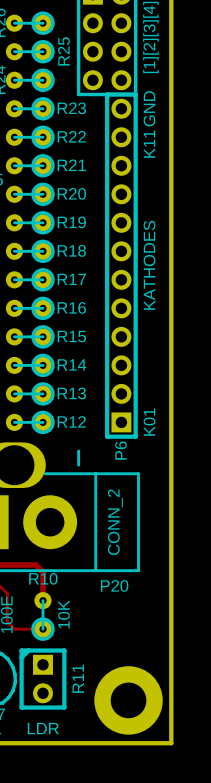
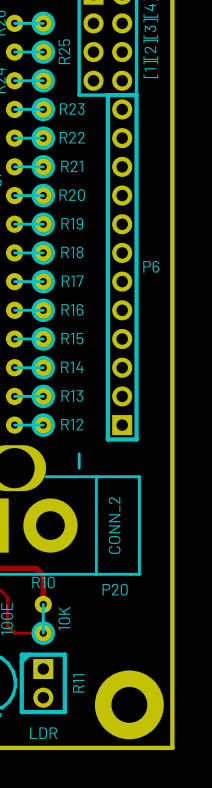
text: GND (149, 108) -> none
text: K11 (149, 144) -> none
text: KATHODES (149, 265) -> none
text: K01 (149, 422) -> none
P6 name rotation: 0° (120, 450) -> 90° clockwise (151, 266)
P6 name position: P6 (120, 450) -> P6 (151, 266)

